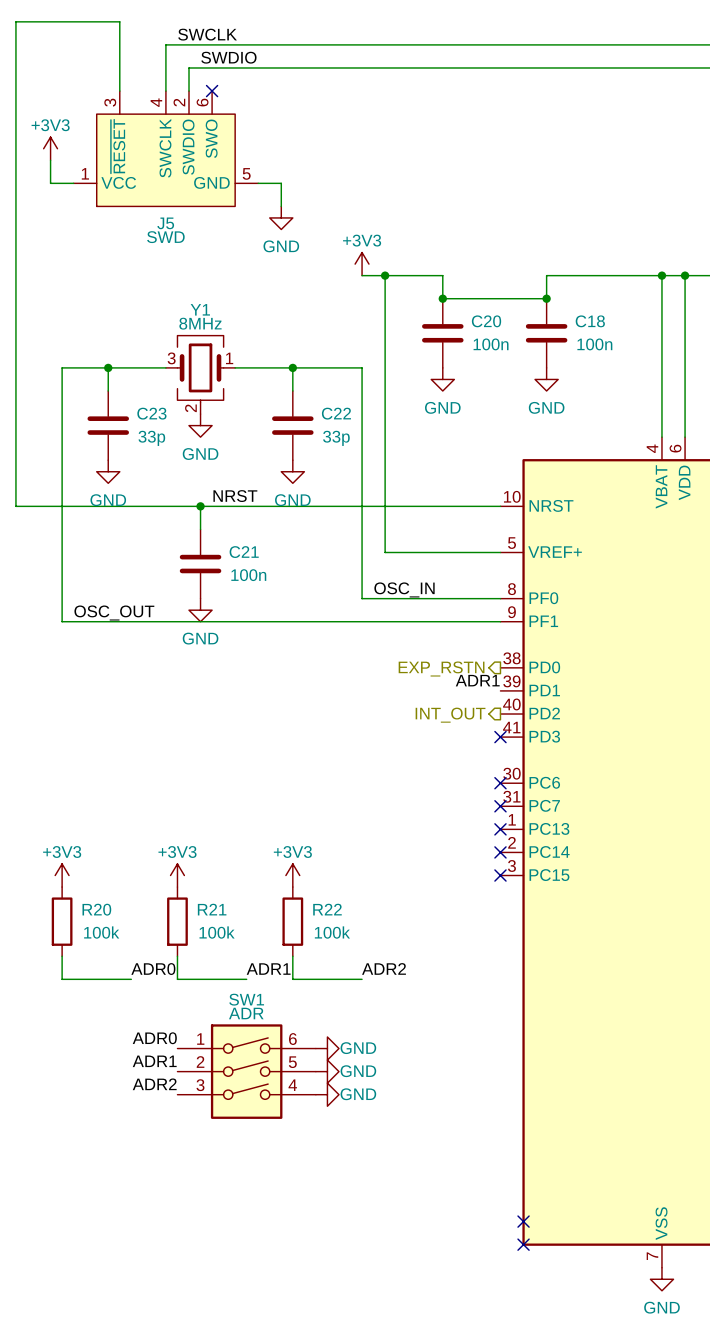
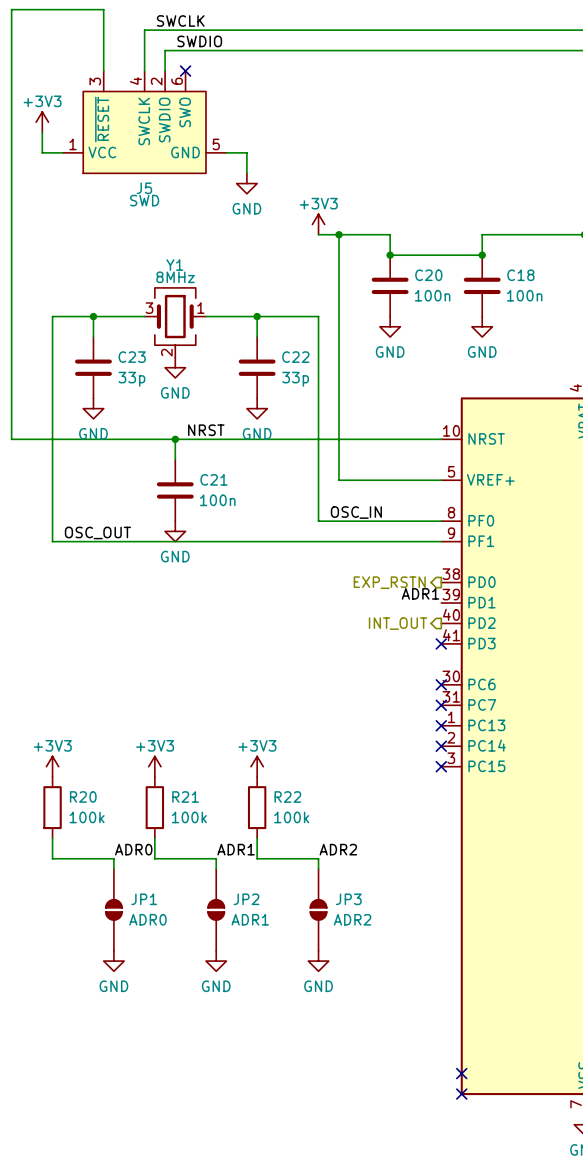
wire: none -> (113, 858) (113, 868)
wire: none -> (216, 858) (216, 868)
wire: none -> (318, 858) (318, 868)
JP1: none -> ADR0 (113, 909)
JP2: none -> ADR1 (216, 909)
JP3: none -> ADR2 (318, 909)
label: ADR0 (154, 1038) -> none
power symbol: GND (327, 1048) -> none
label: ADR1 (154, 1061) -> none
SW1: ADR (246, 1071) -> none
power symbol: GND (327, 1071) -> none
label: ADR2 (154, 1084) -> none
power symbol: none -> GND (113, 961)
power symbol: none -> GND (216, 961)
power symbol: GND (327, 1094) -> none
power symbol: none -> GND (318, 961)

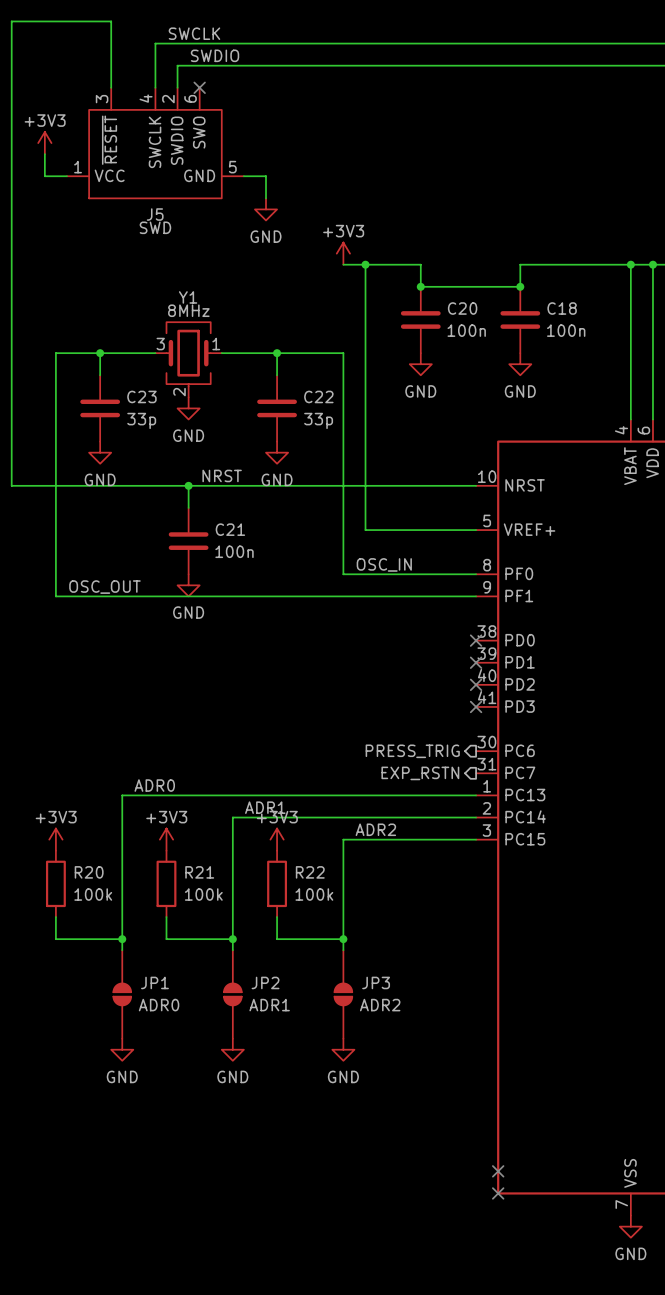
hierarchical label position: EXP_RSTN (389, 582) -> EXP_RSTN (420, 773)
no-connect mark: none -> (476, 640)
label: ADR1 (420, 593) -> none
no-connect mark: none -> (476, 662)
hierarchical label: INT_OUT (398, 623) -> none
no-connect mark: none -> (476, 684)
hierarchical label: none -> PRESS_TRIG (412, 751)
no-connect mark: (441, 684) -> none
no-connect mark: (441, 705) -> none
wire: none -> (476, 795) (122, 795) (122, 939)
no-connect mark: (441, 725) -> none
wire: none -> (476, 817) (232, 817) (232, 939)
no-connect mark: (441, 746) -> none
wire: none -> (476, 839) (343, 839) (343, 939)
no-connect mark: (441, 766) -> none
label position: ADR0 (133, 849) -> ADR0 (154, 785)
label position: ADR1 (236, 849) -> ADR1 (265, 807)
label position: ADR2 (338, 849) -> ADR2 (375, 829)
junction: none -> (122, 939)
junction: none -> (232, 939)
junction: none -> (343, 939)

